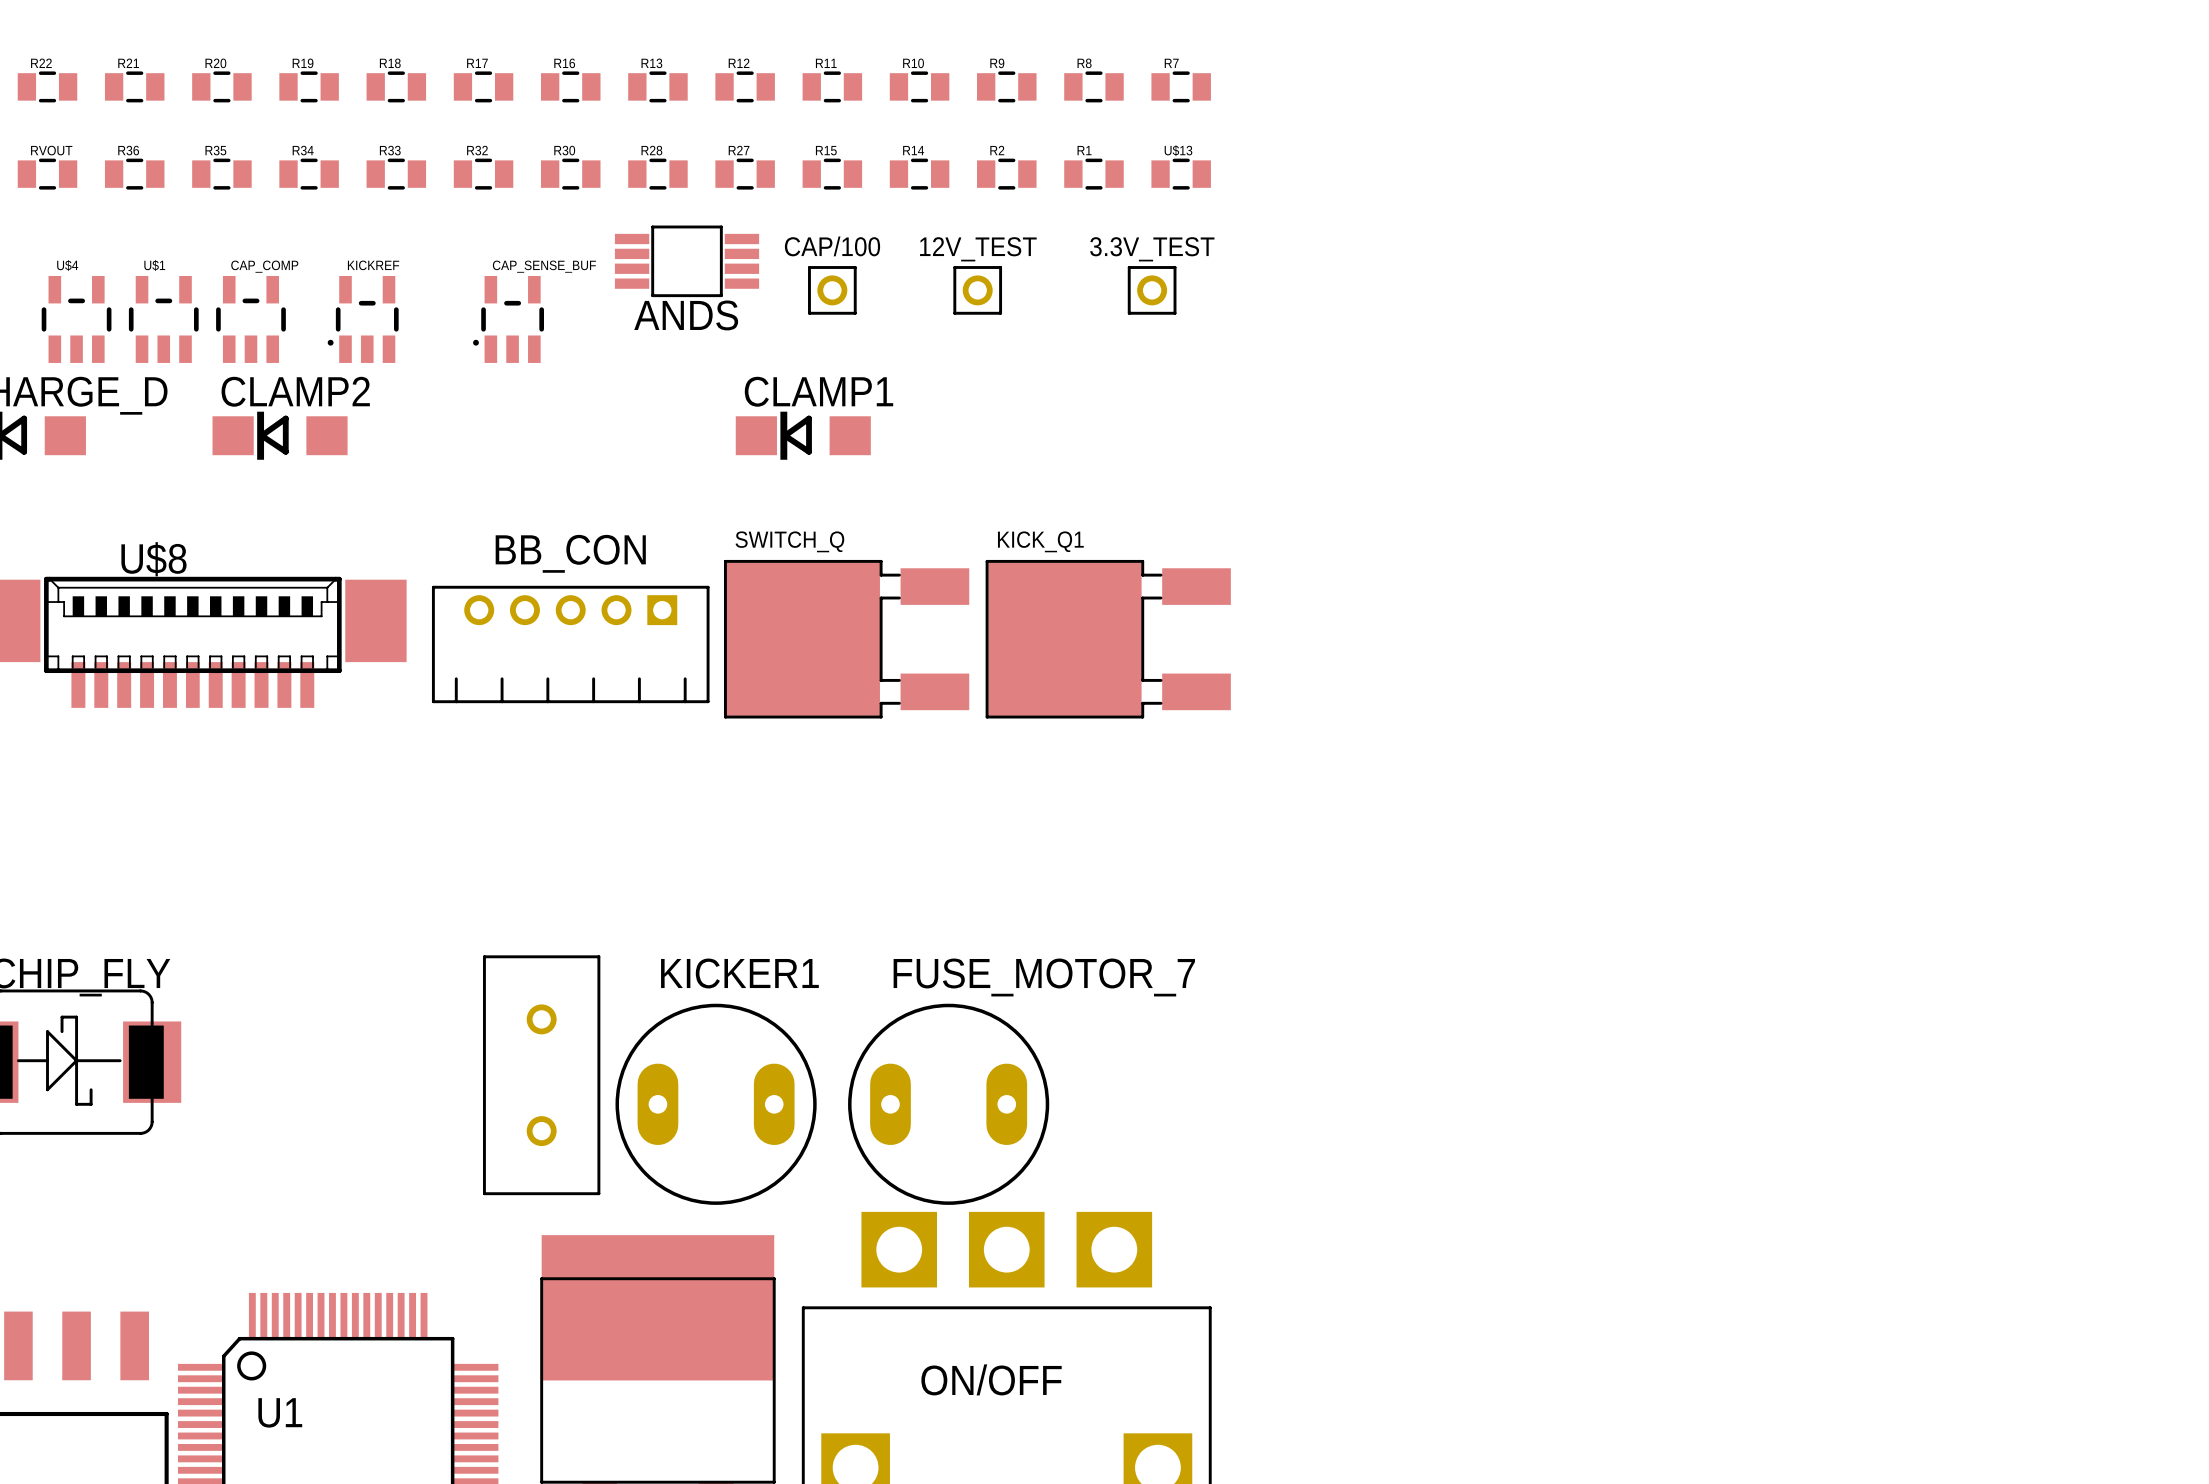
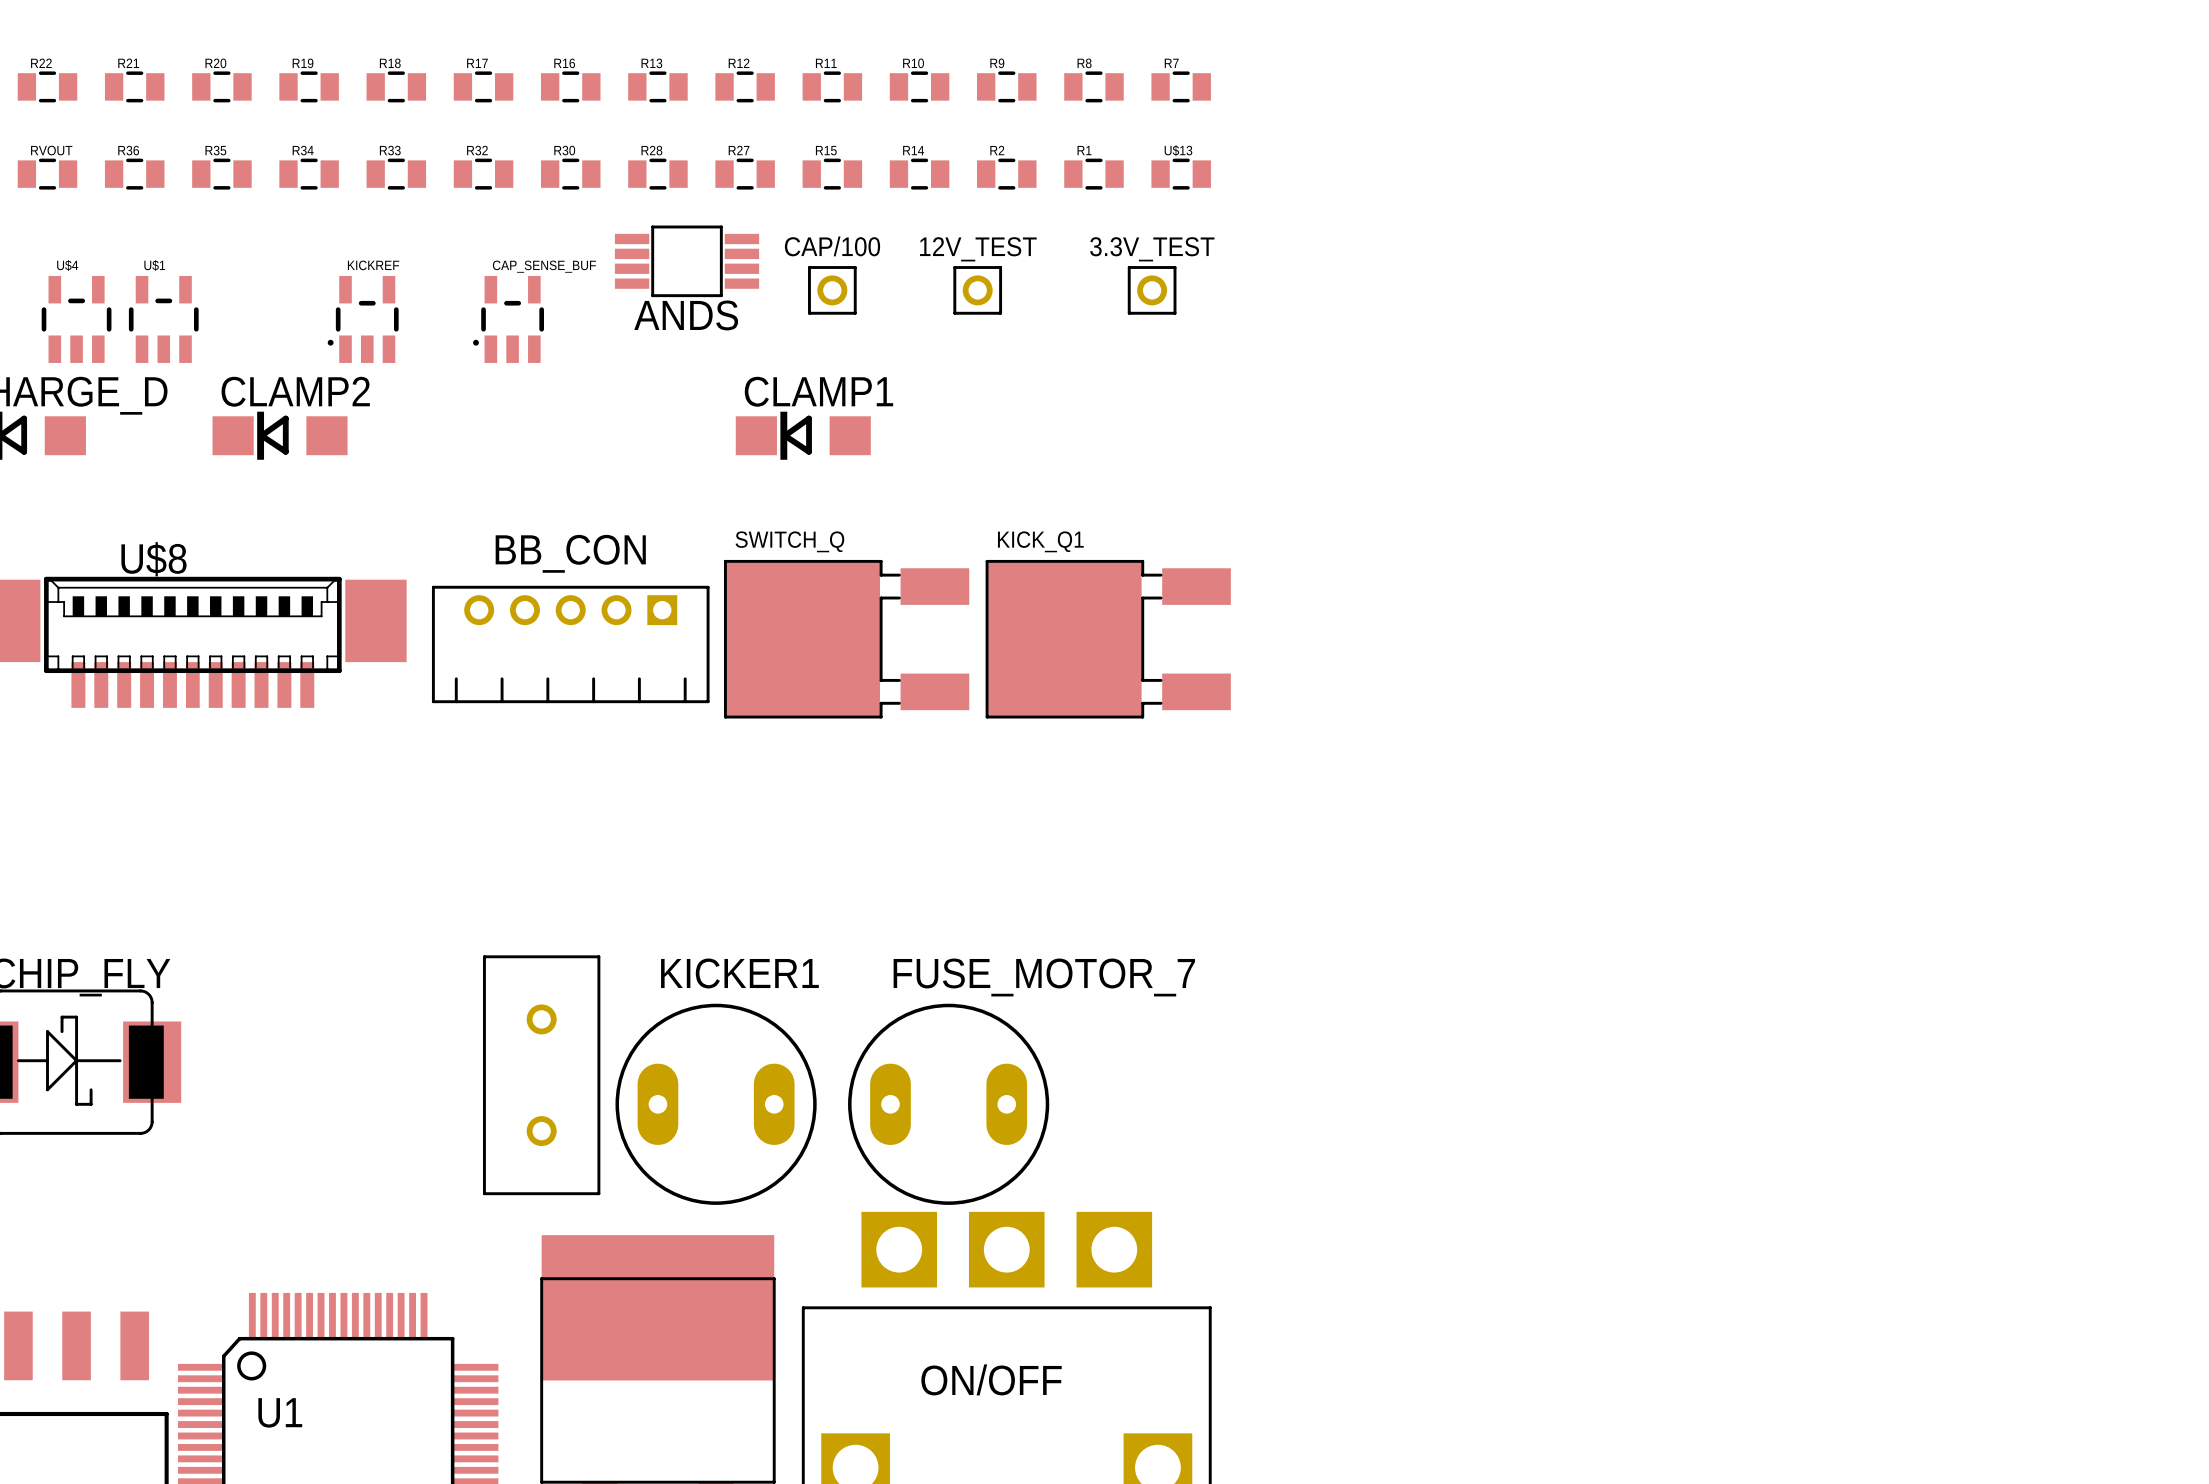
CAP_COMP: (250, 319) -> none

